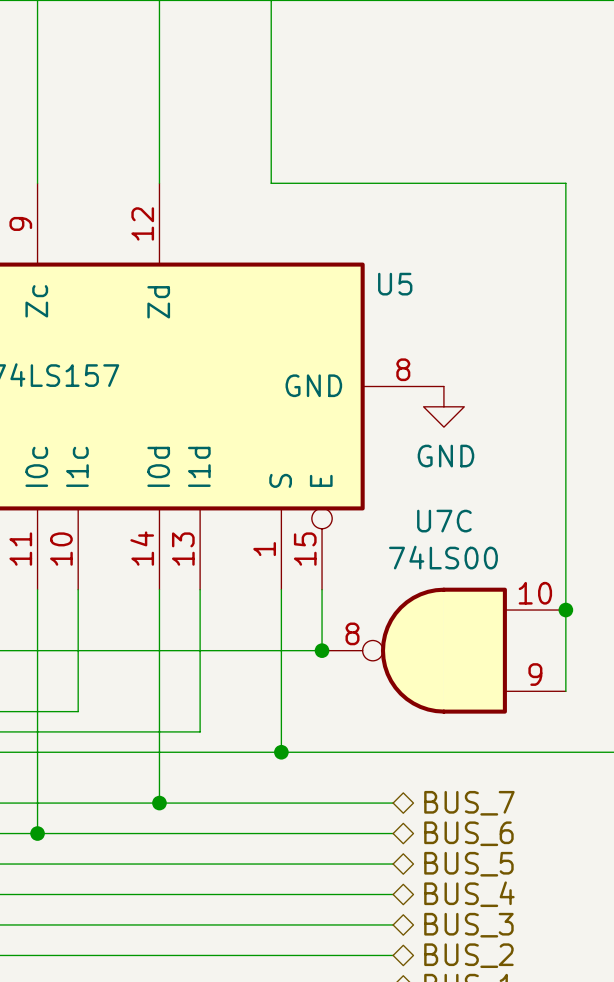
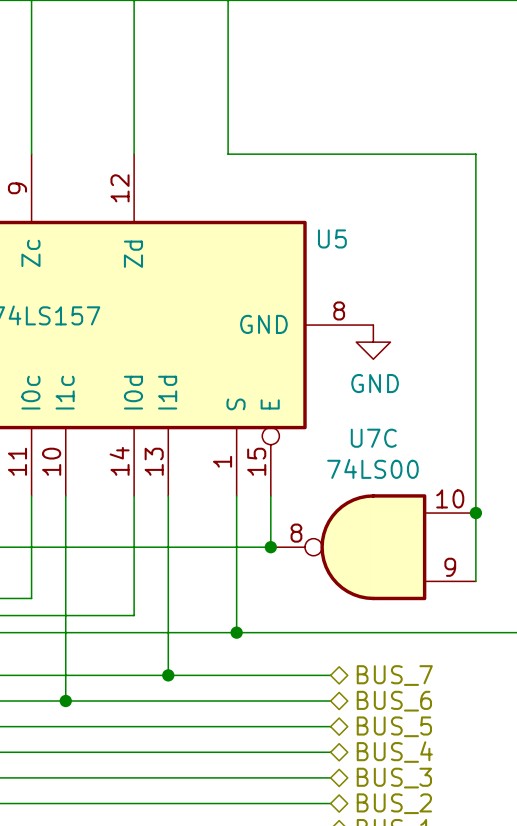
wire: (78, 711) (37, 711) (37, 833) -> (65, 598) (65, 701)
wire: (200, 731) (159, 731) (159, 803) -> (168, 615) (168, 675)
junction position: (159, 803) -> (168, 675)
junction position: (37, 833) -> (65, 701)

